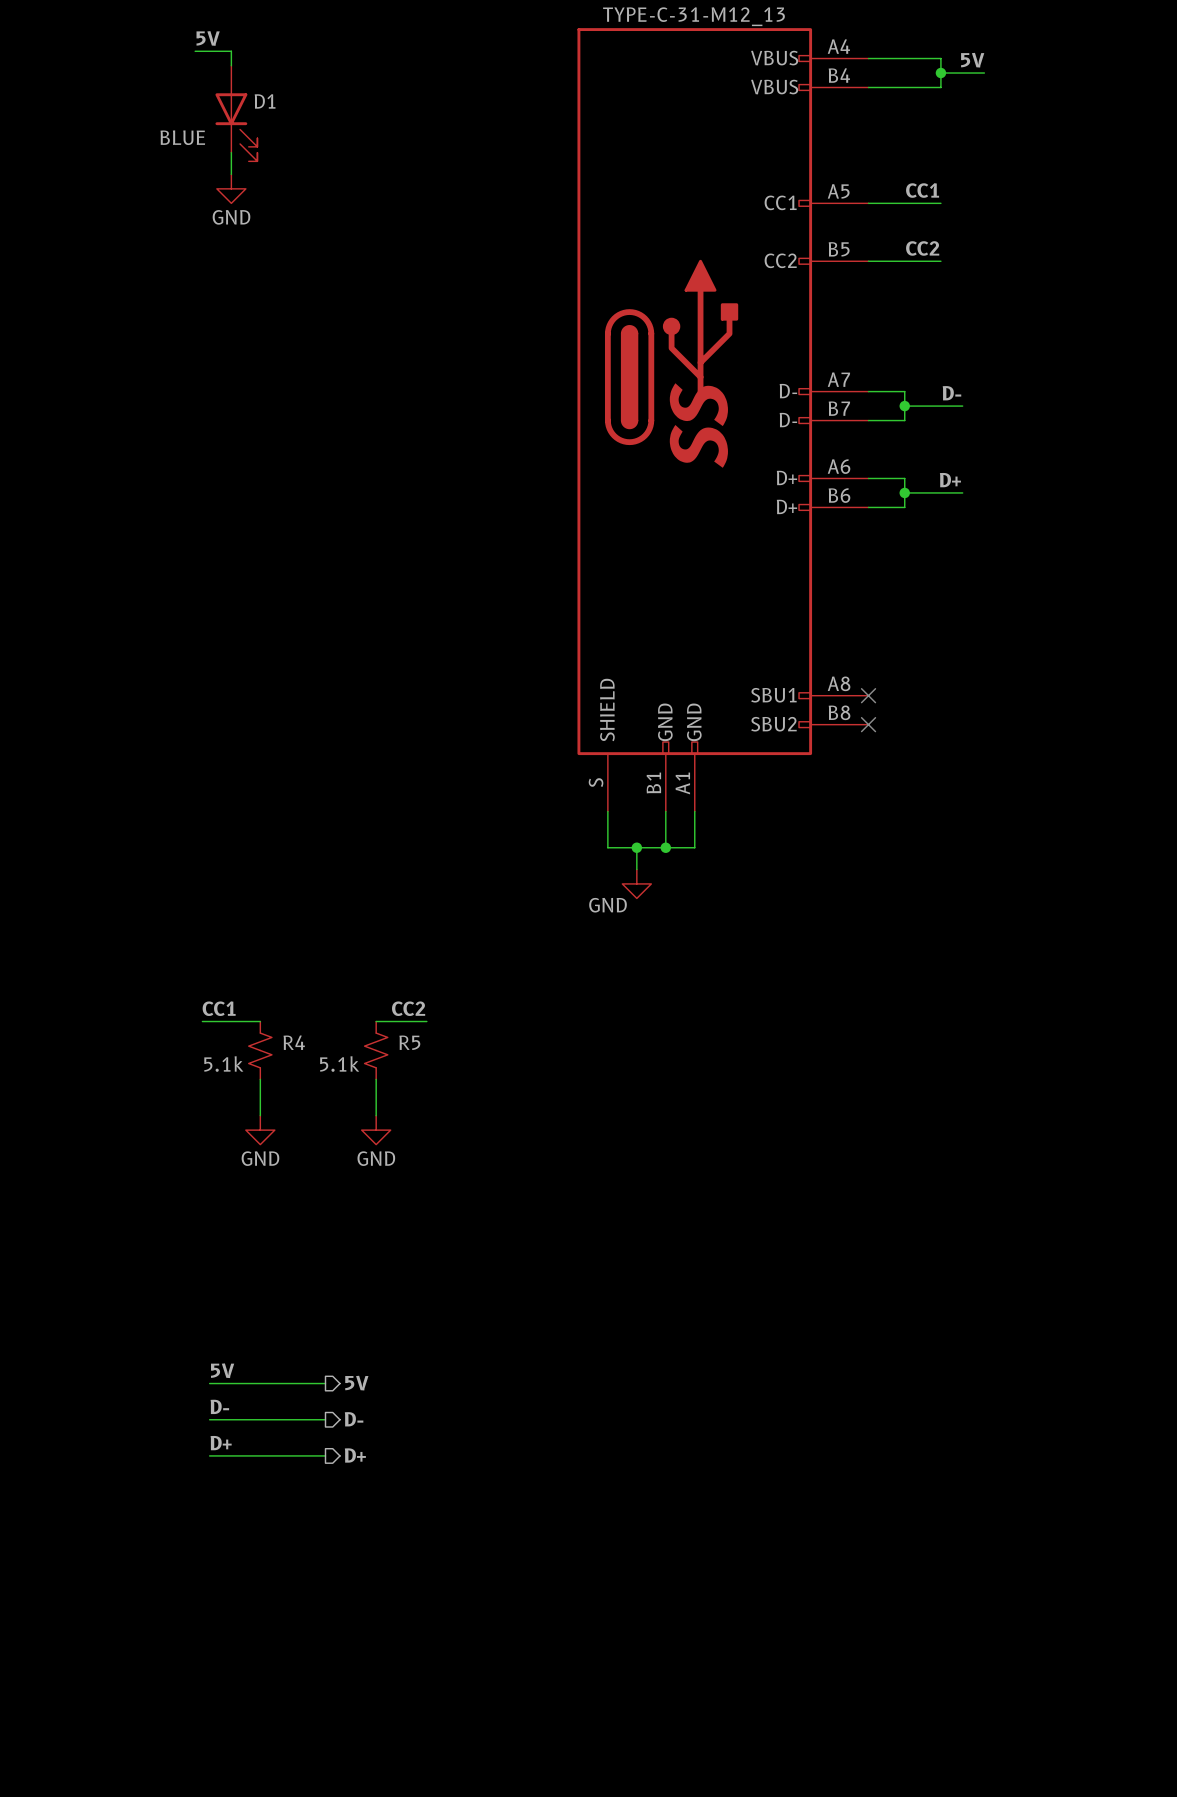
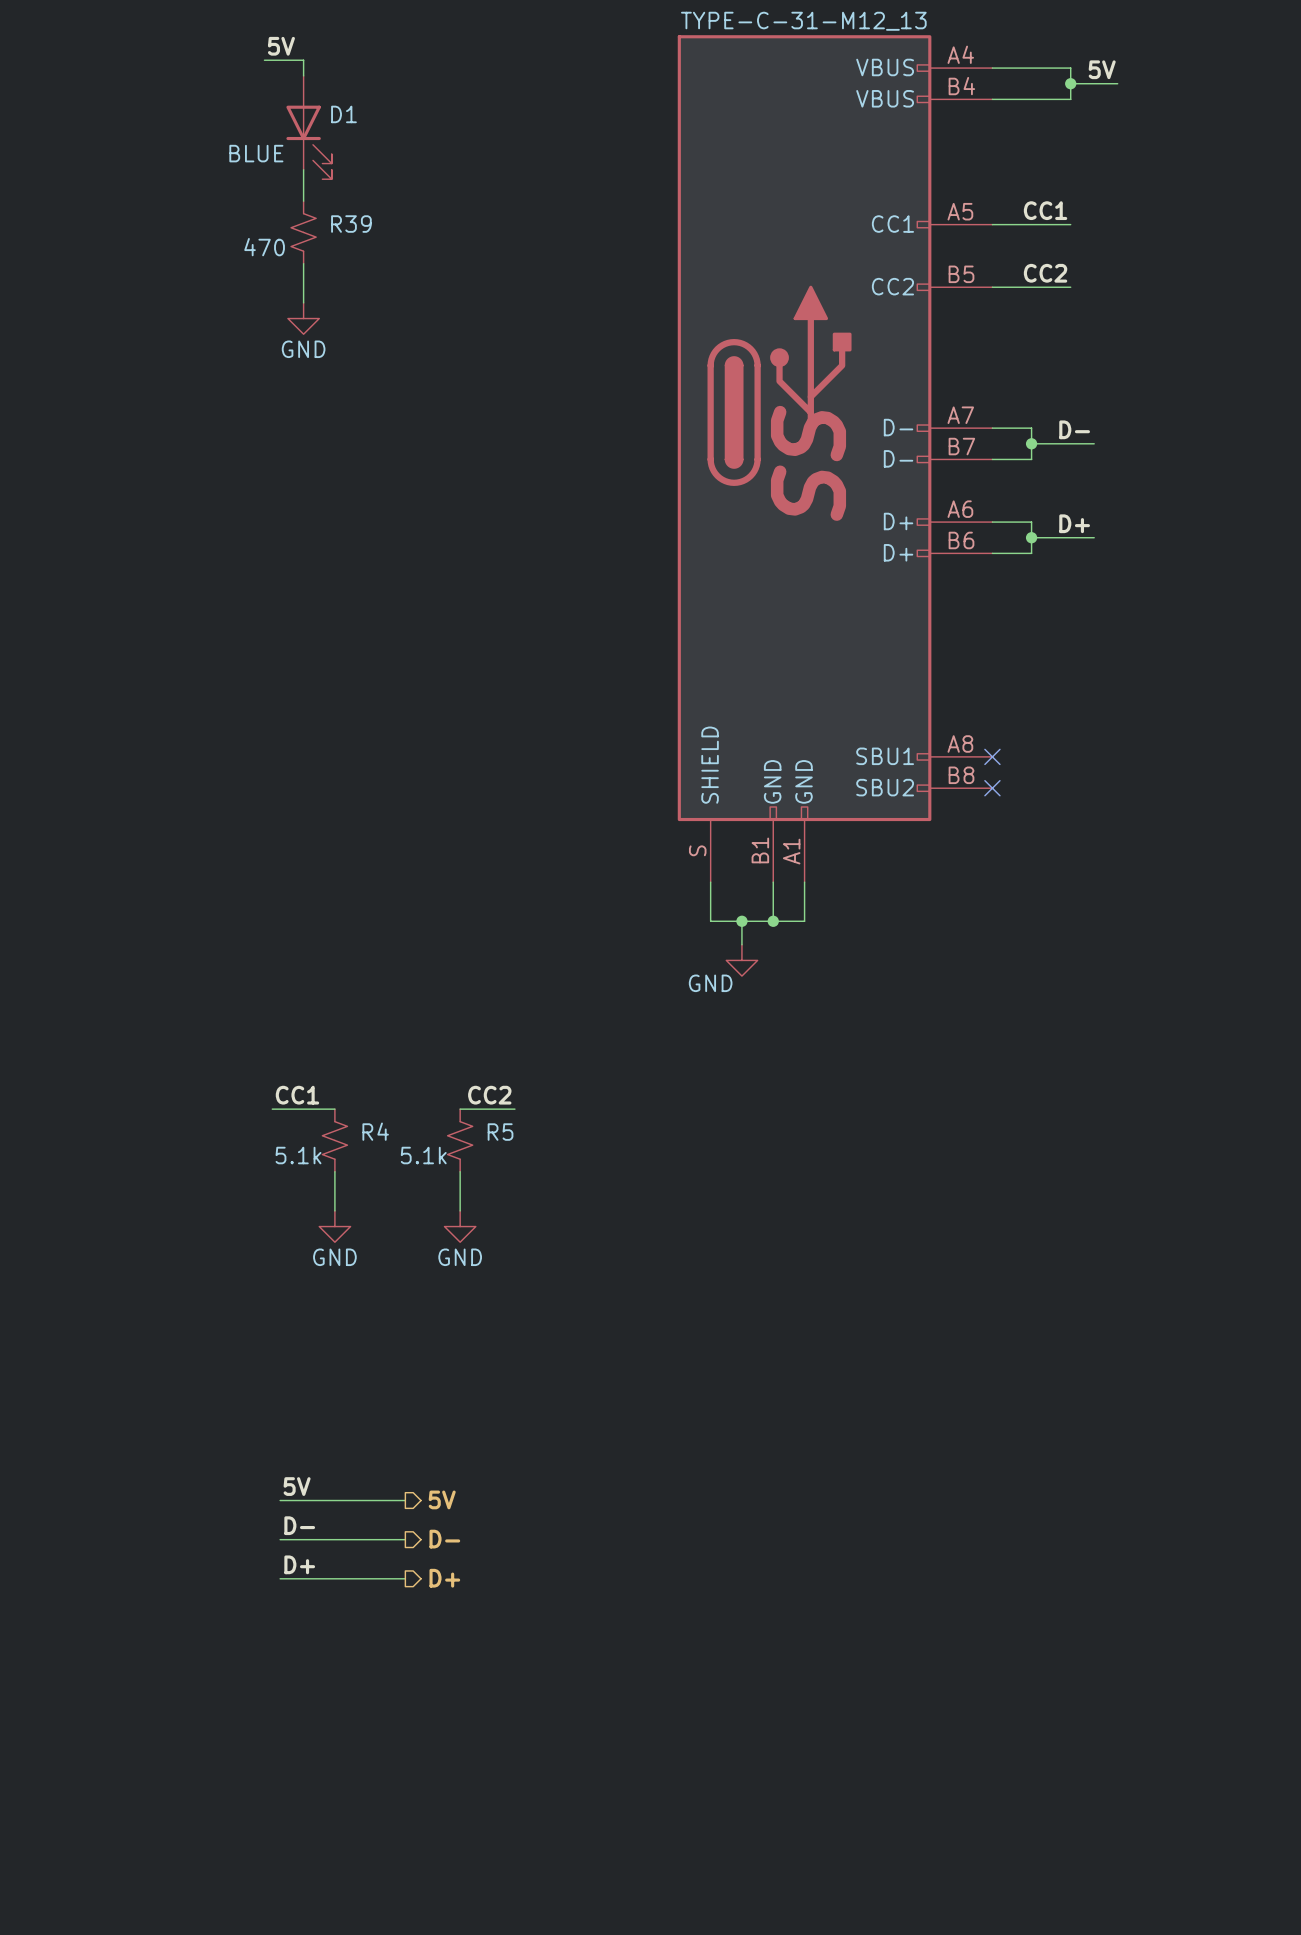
power symbol position: GND (231, 188) -> GND (303, 318)
R39: none -> 470 (303, 232)
wire: none -> (303, 263) (303, 302)

